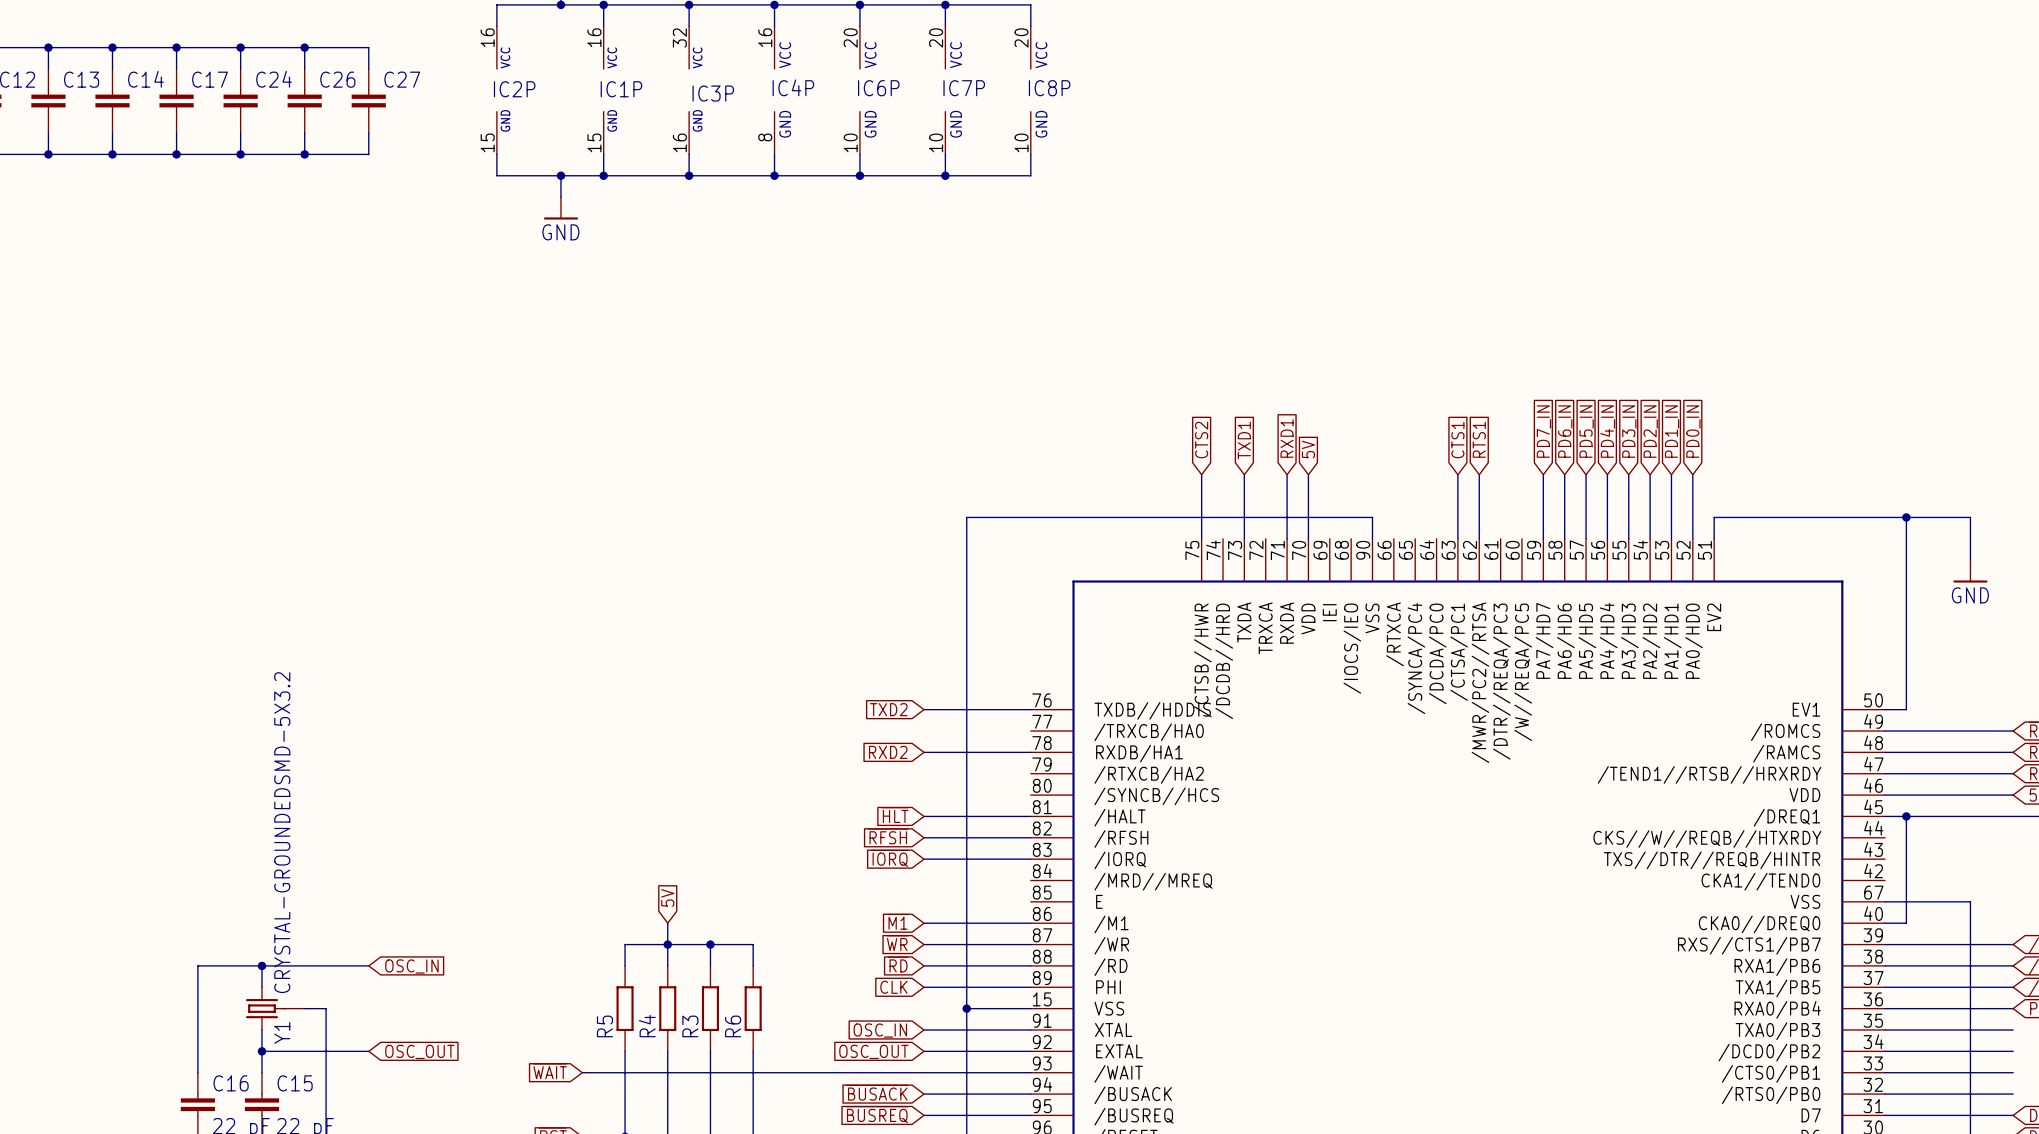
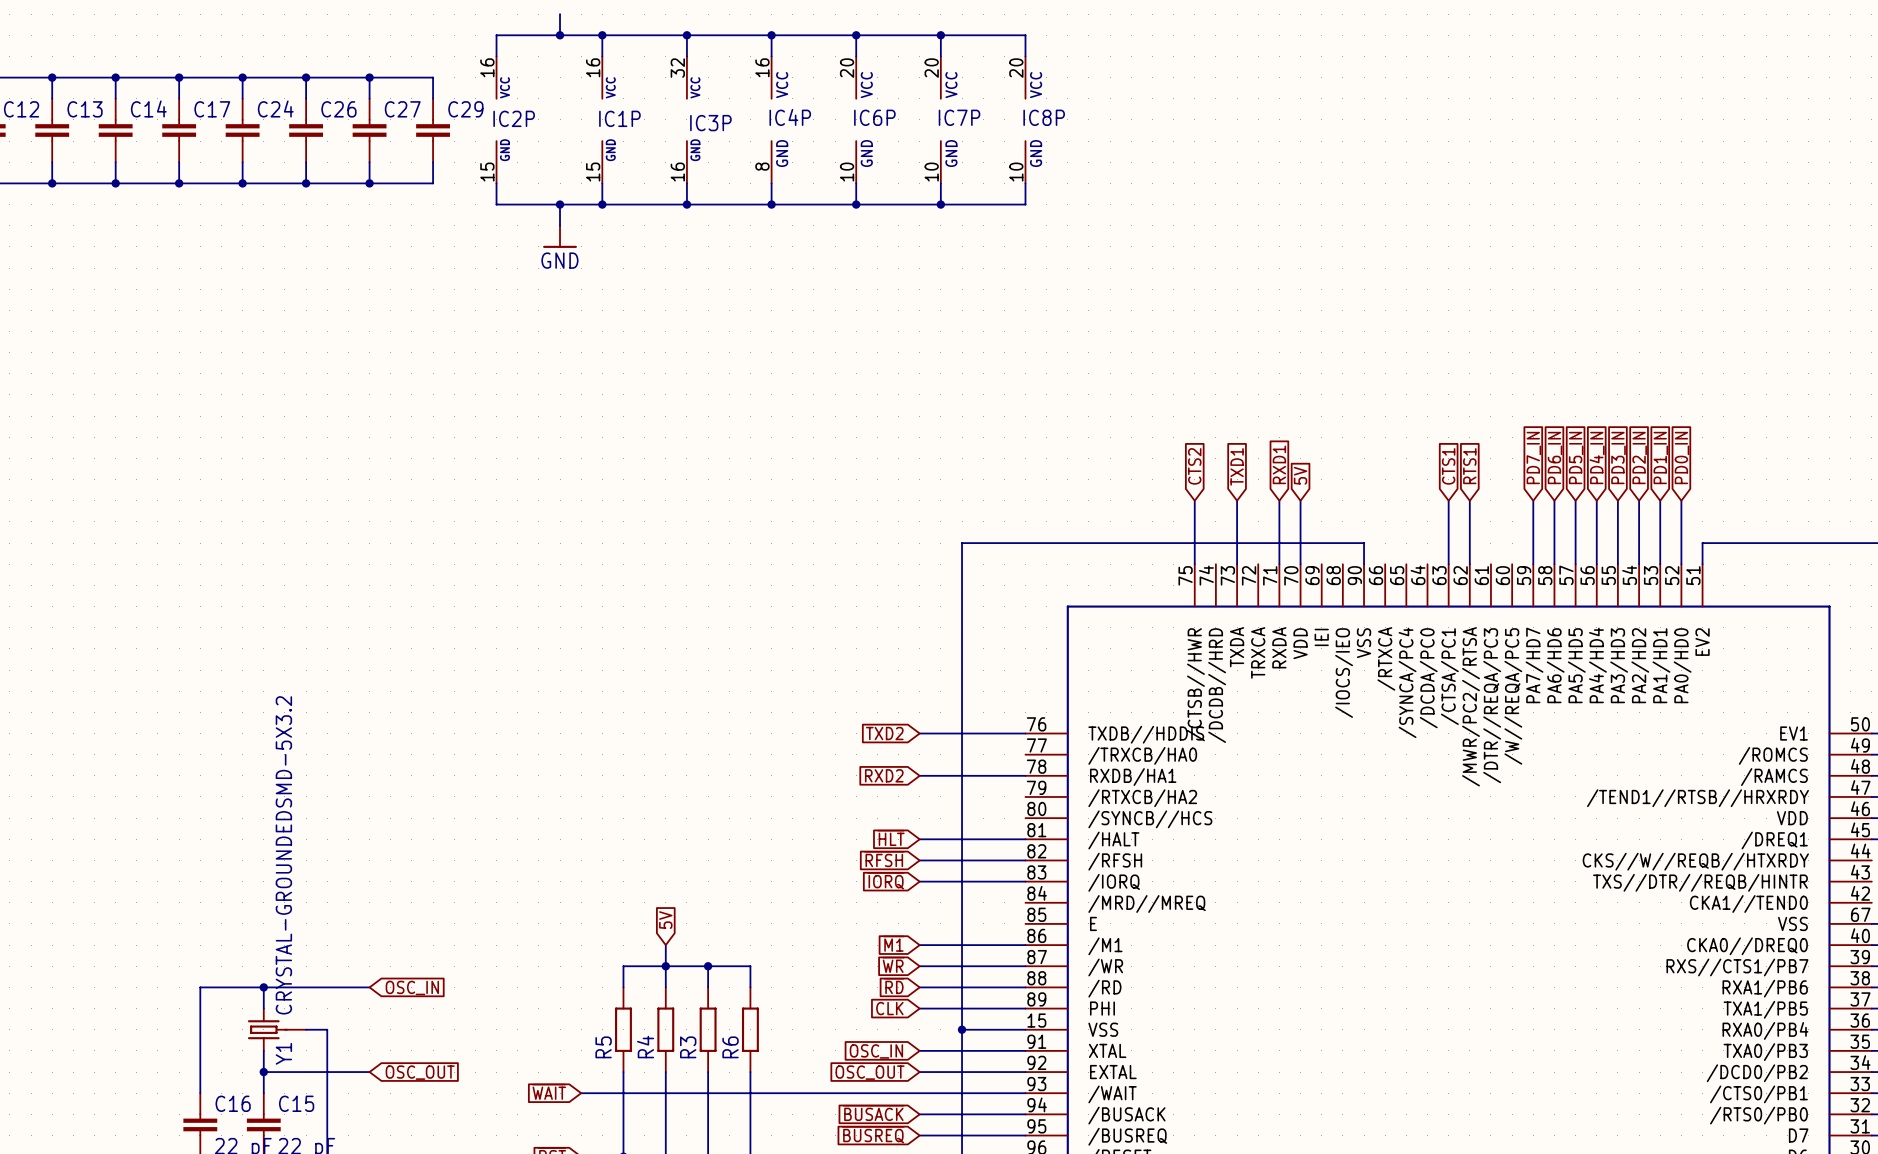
wire: none -> (369, 77) (433, 77) (433, 98)
junction: none -> (369, 77)
C29: none -> (433, 130)
wire: none -> (433, 162) (433, 183) (369, 183)
junction: none -> (369, 183)

